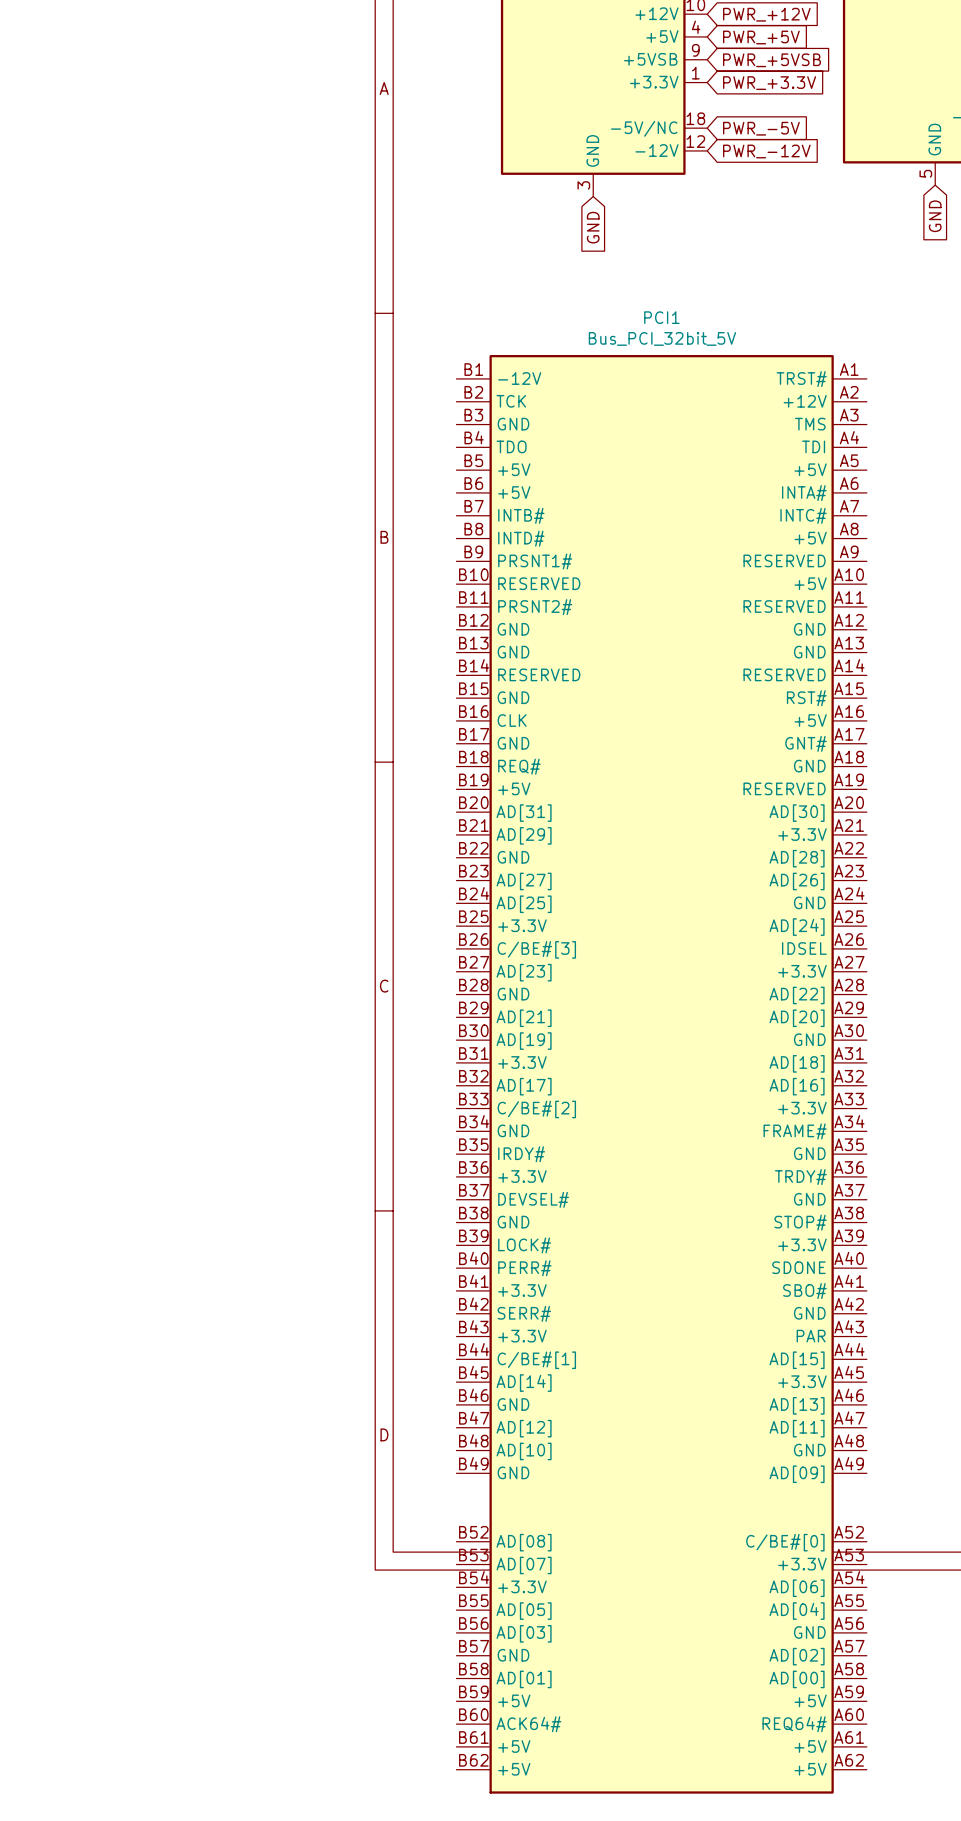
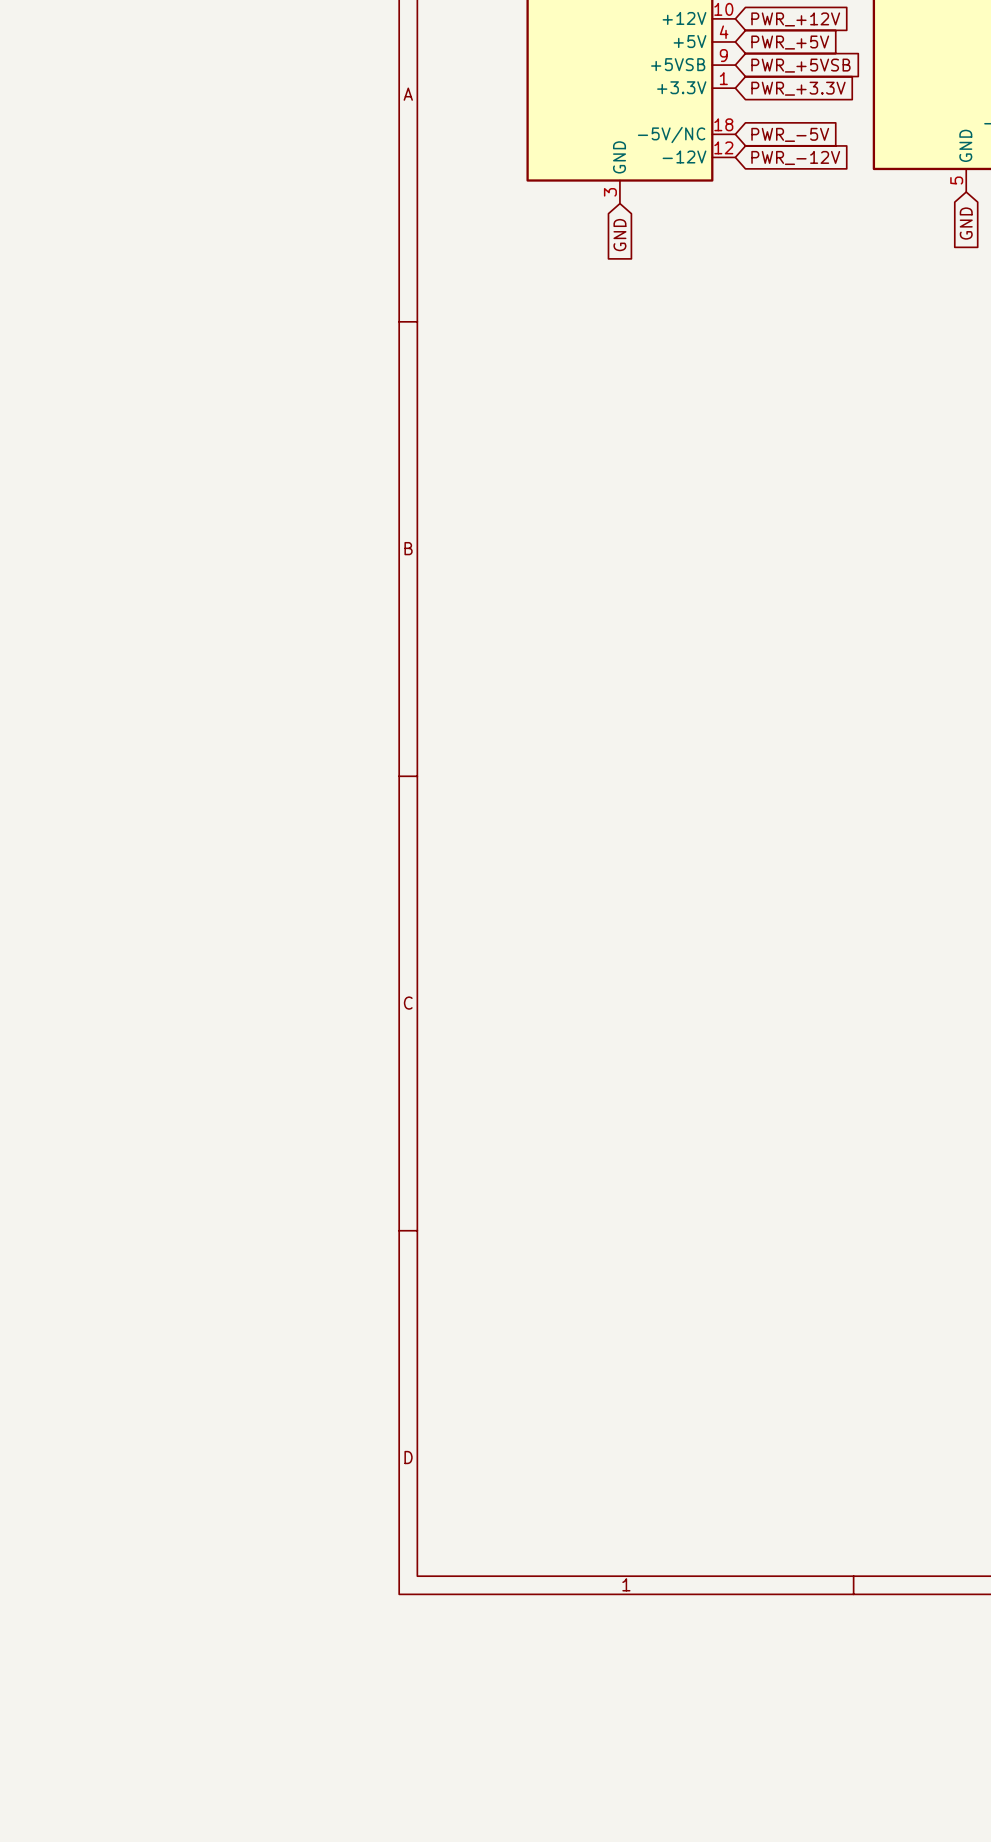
PCI1: Bus_PCI_32bit_5V (661, 1074) -> none

